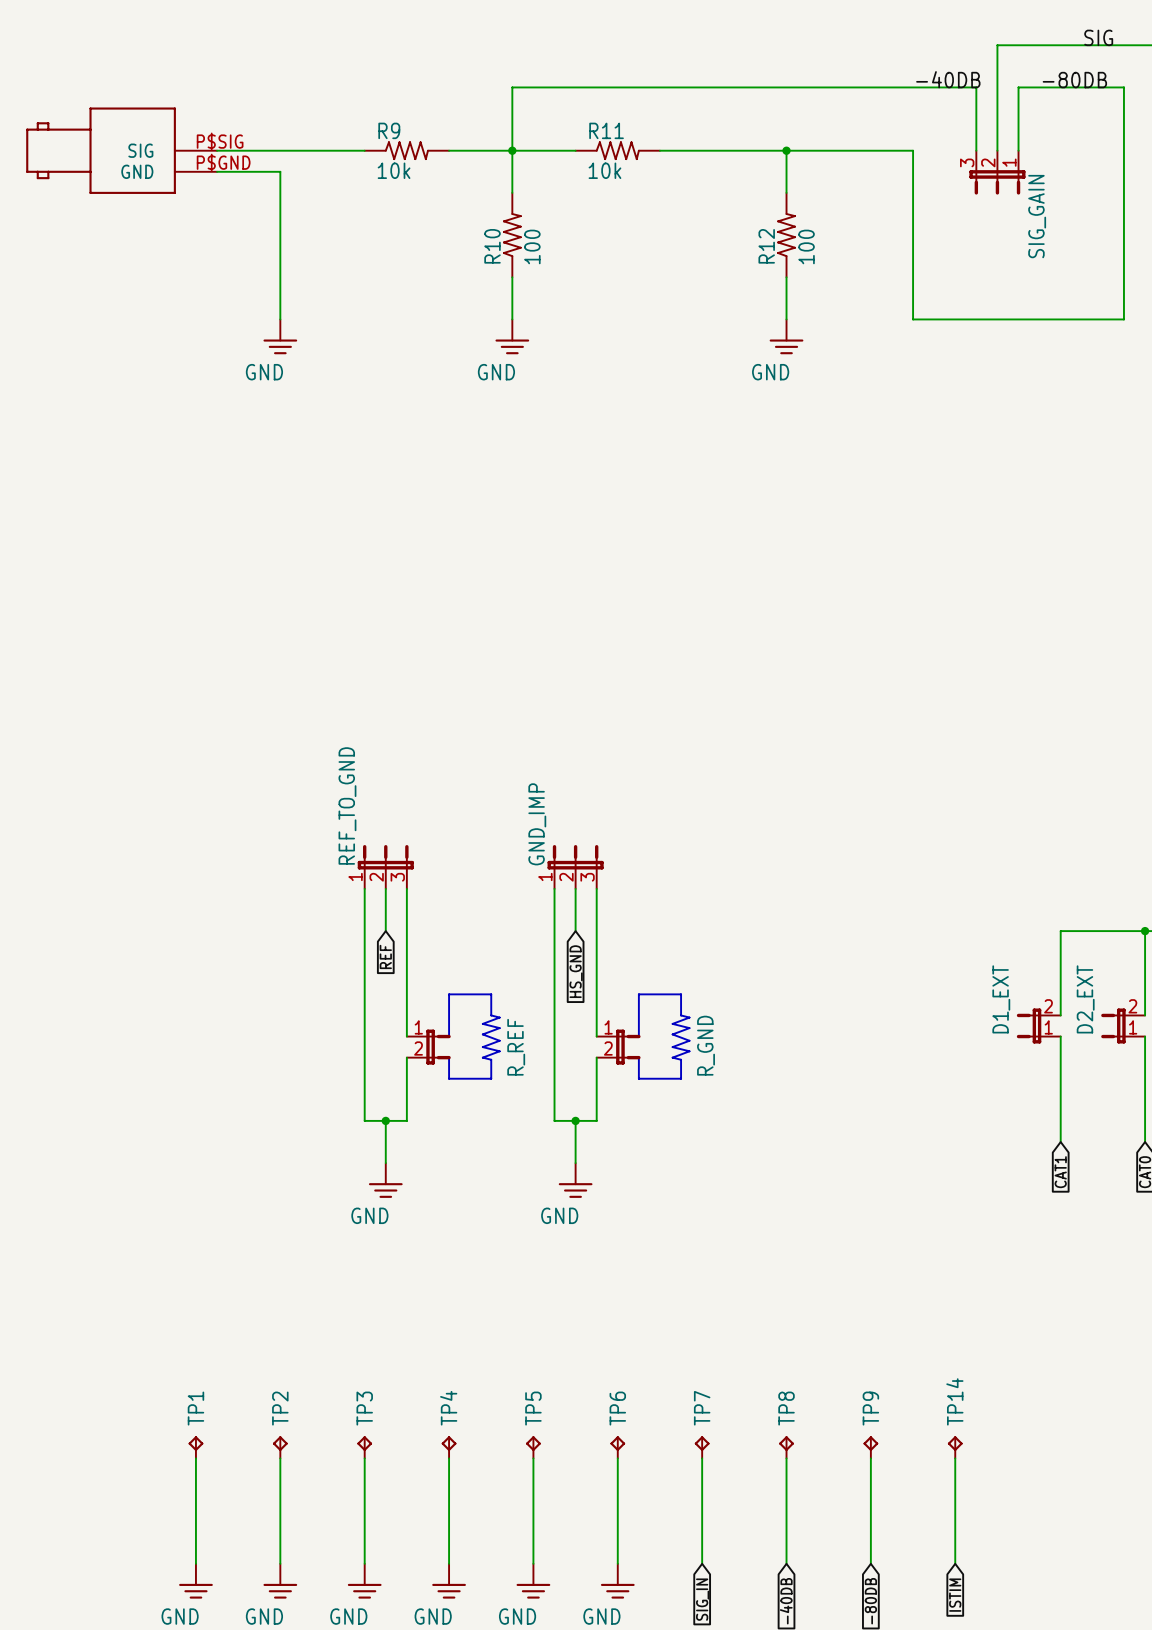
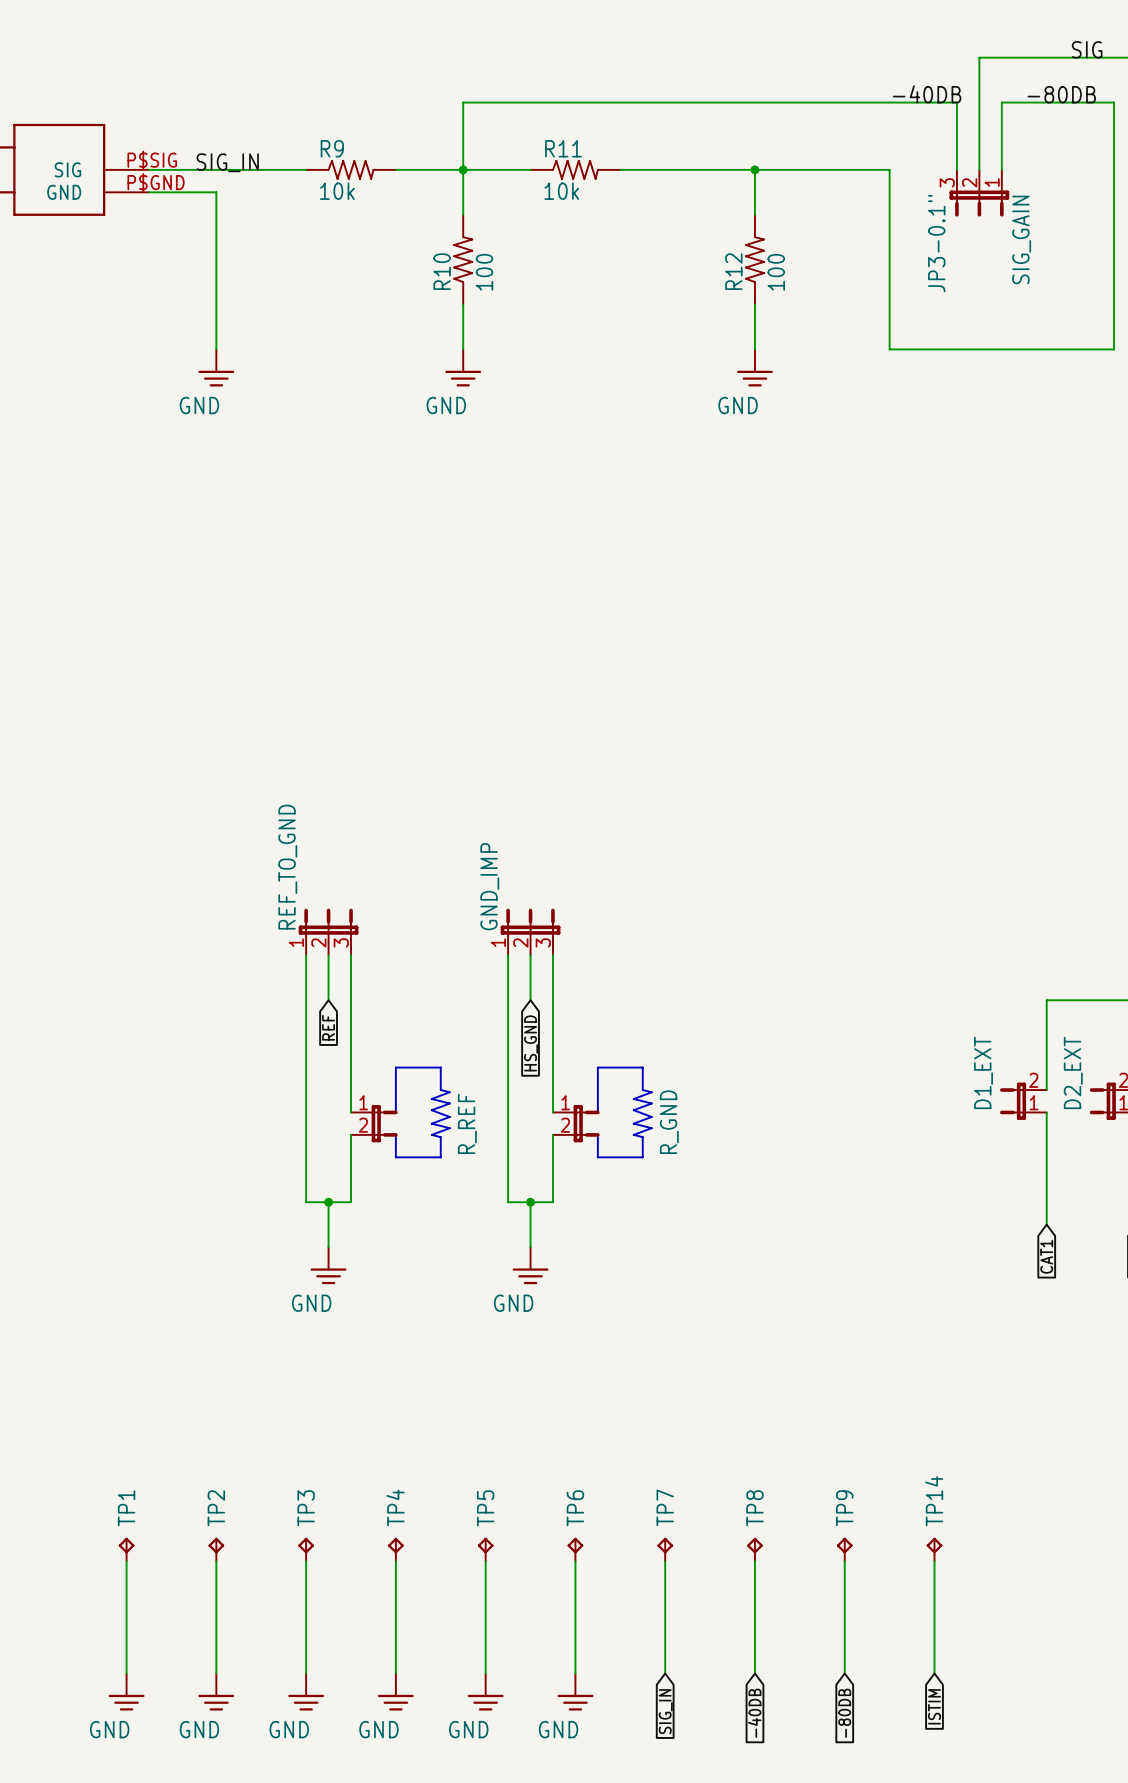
label: none -> SIG_IN (227, 162)
SIG_GAIN value: none -> JP3-0.1" (936, 243)

